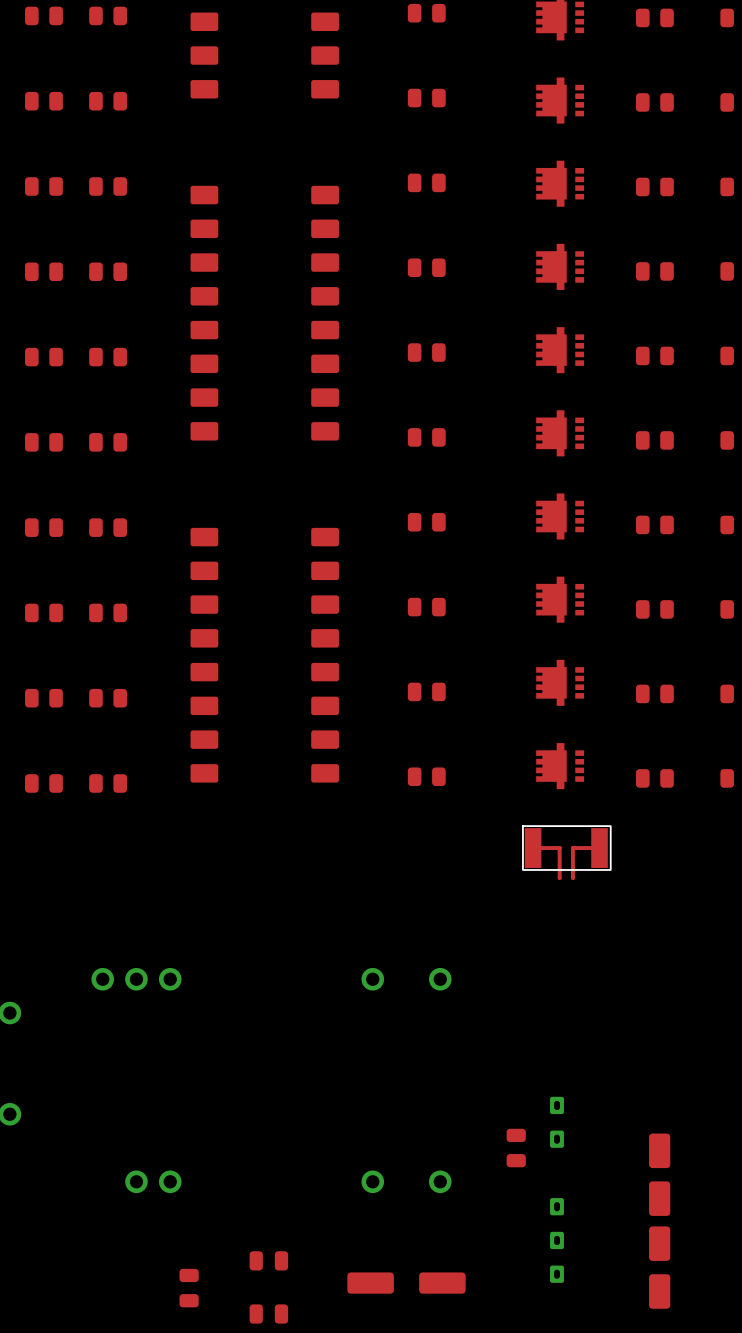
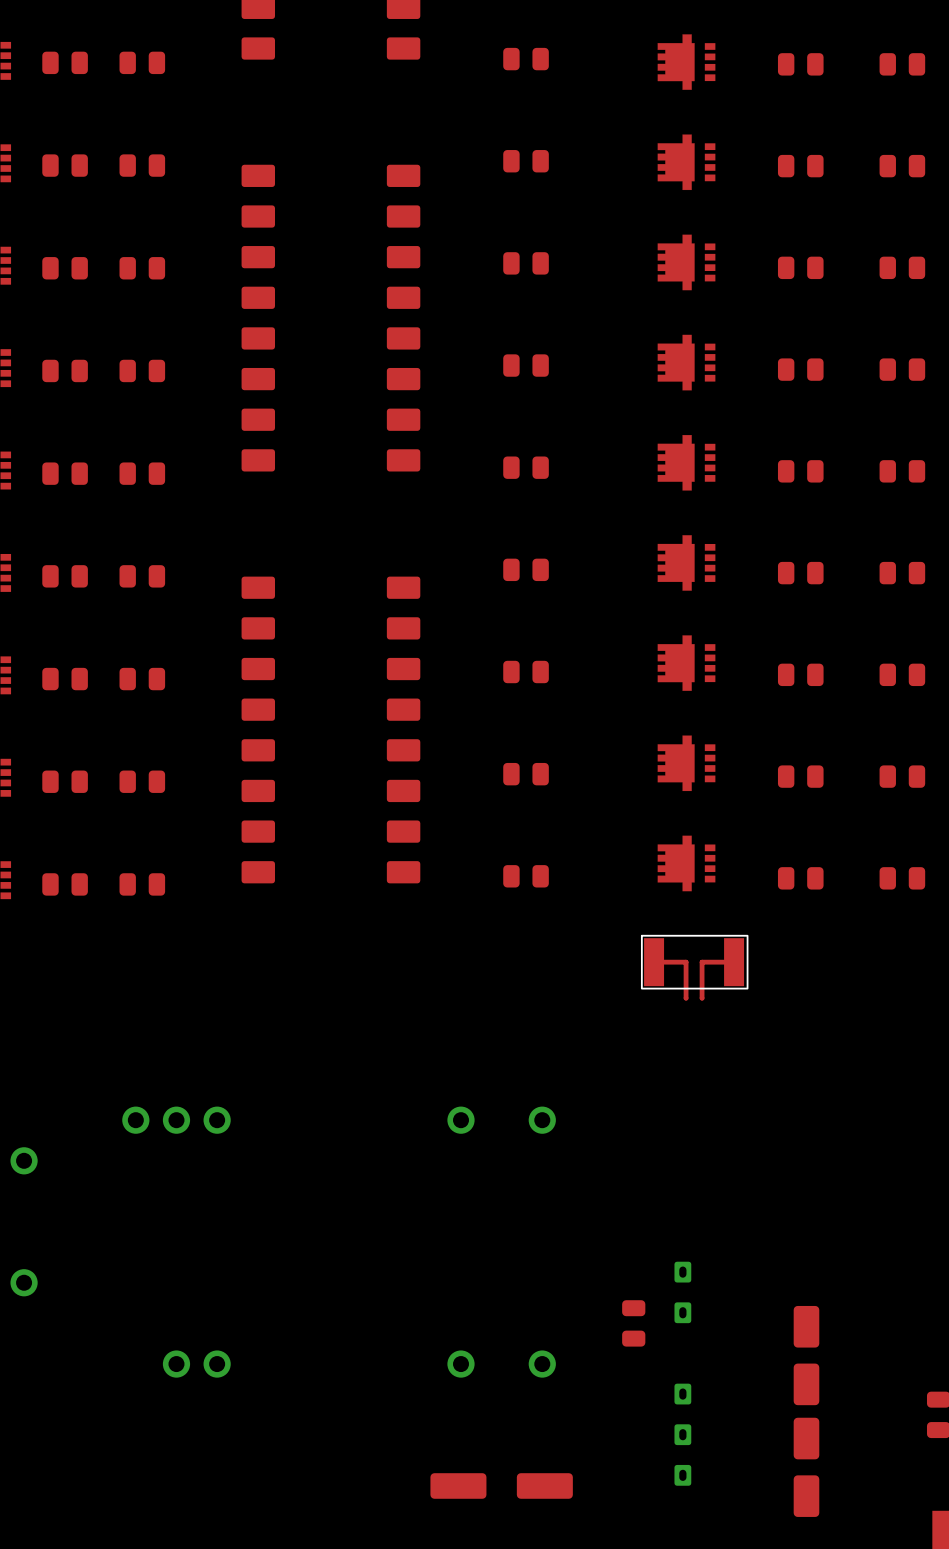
part: (268, 1260) -> none
part: (189, 1288) -> none
part: (268, 1314) -> none

